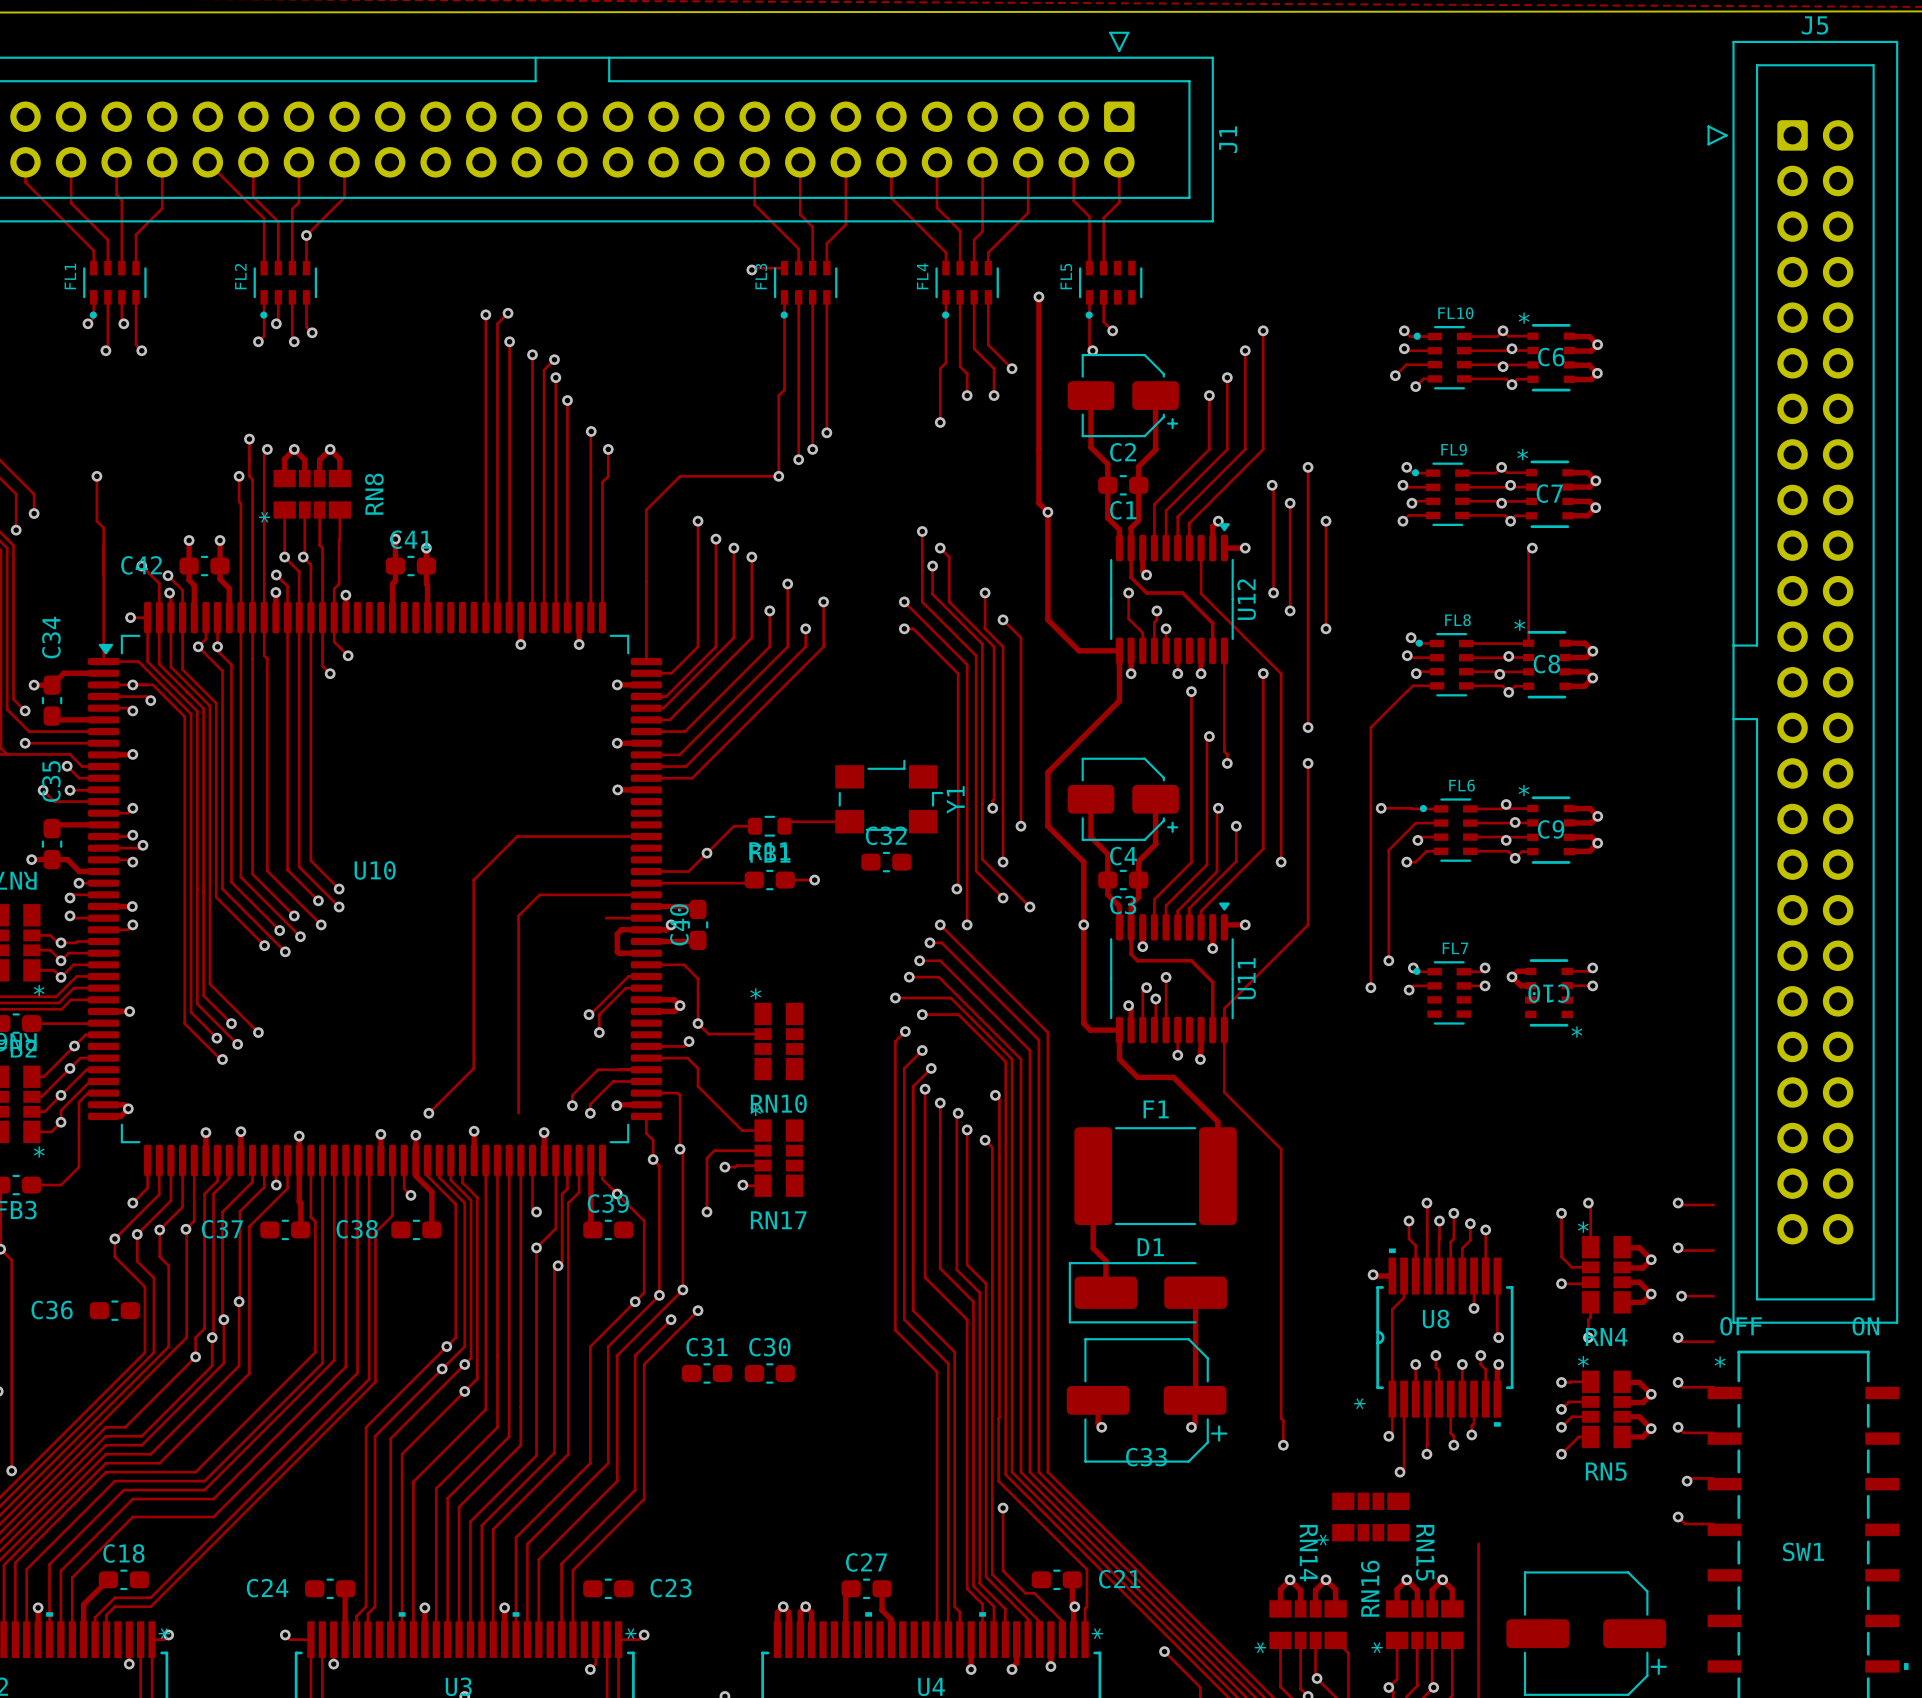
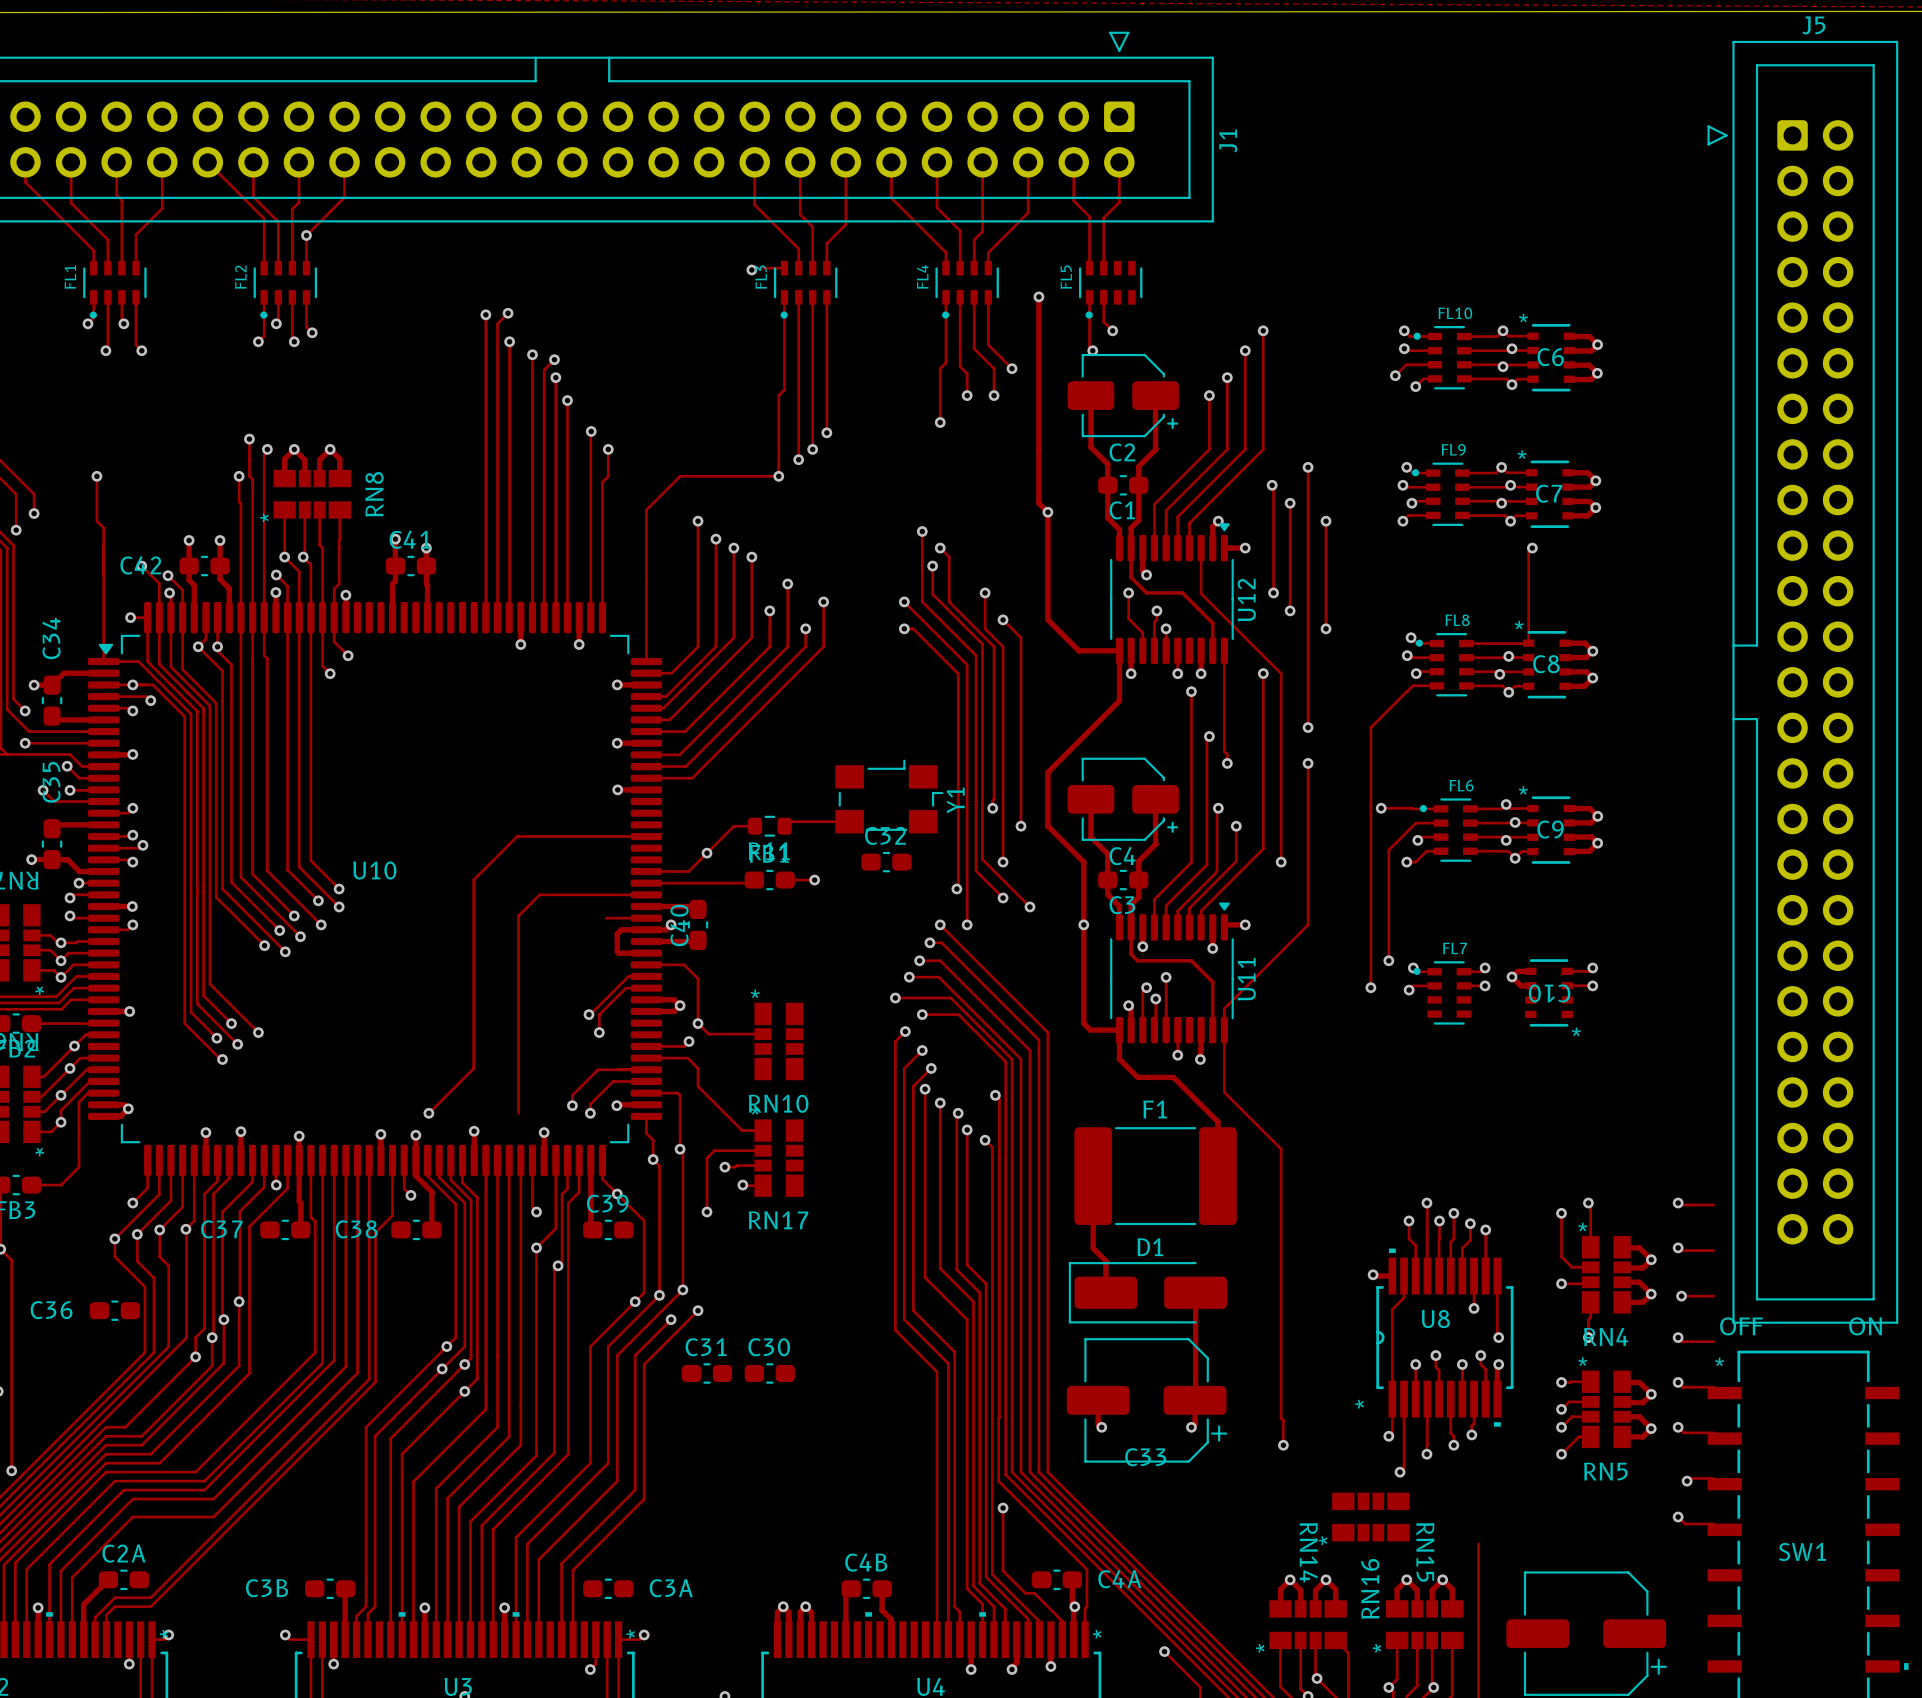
C18 name: C18 (123, 1553) -> C2A (123, 1553)
C27 name: C27 (866, 1562) -> C4B (866, 1562)
C21 name: C21 (1119, 1579) -> C4A (1119, 1579)
C24 name: C24 (267, 1588) -> C3B (266, 1588)
C23 name: C23 (671, 1588) -> C3A (671, 1588)

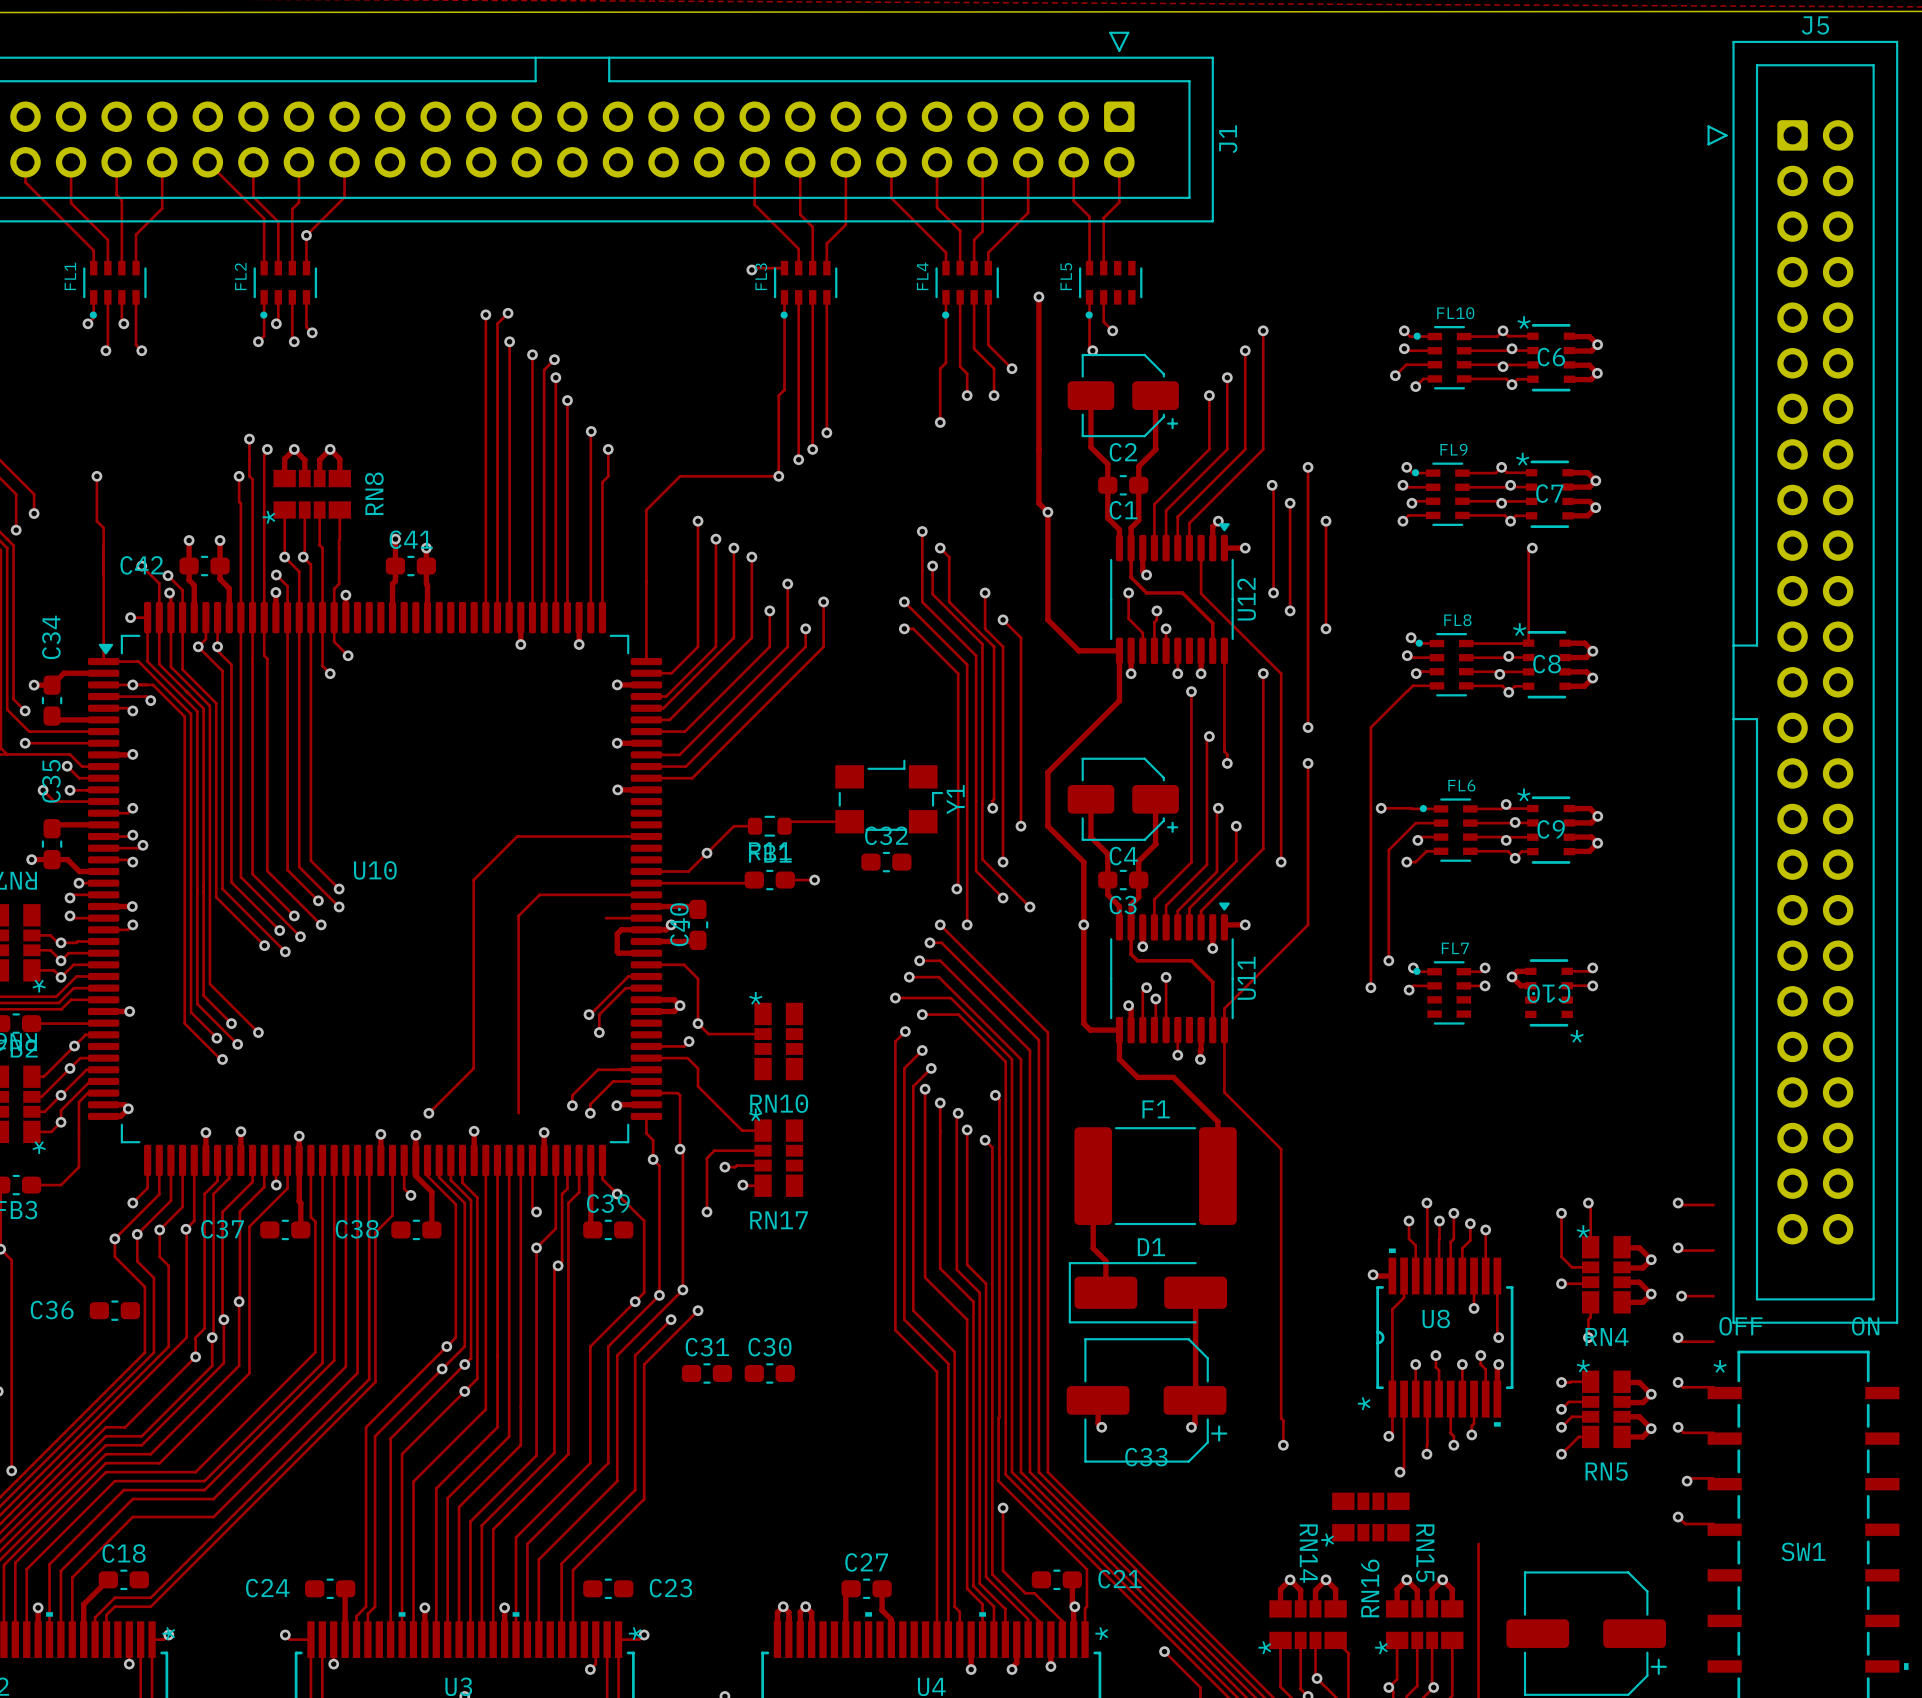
C2A name: C2A (123, 1553) -> C18 (124, 1553)
C4B name: C4B (866, 1562) -> C27 (866, 1562)
C4A name: C4A (1119, 1579) -> C21 (1119, 1579)
C3B name: C3B (266, 1588) -> C24 (267, 1588)
C3A name: C3A (671, 1588) -> C23 (670, 1588)

